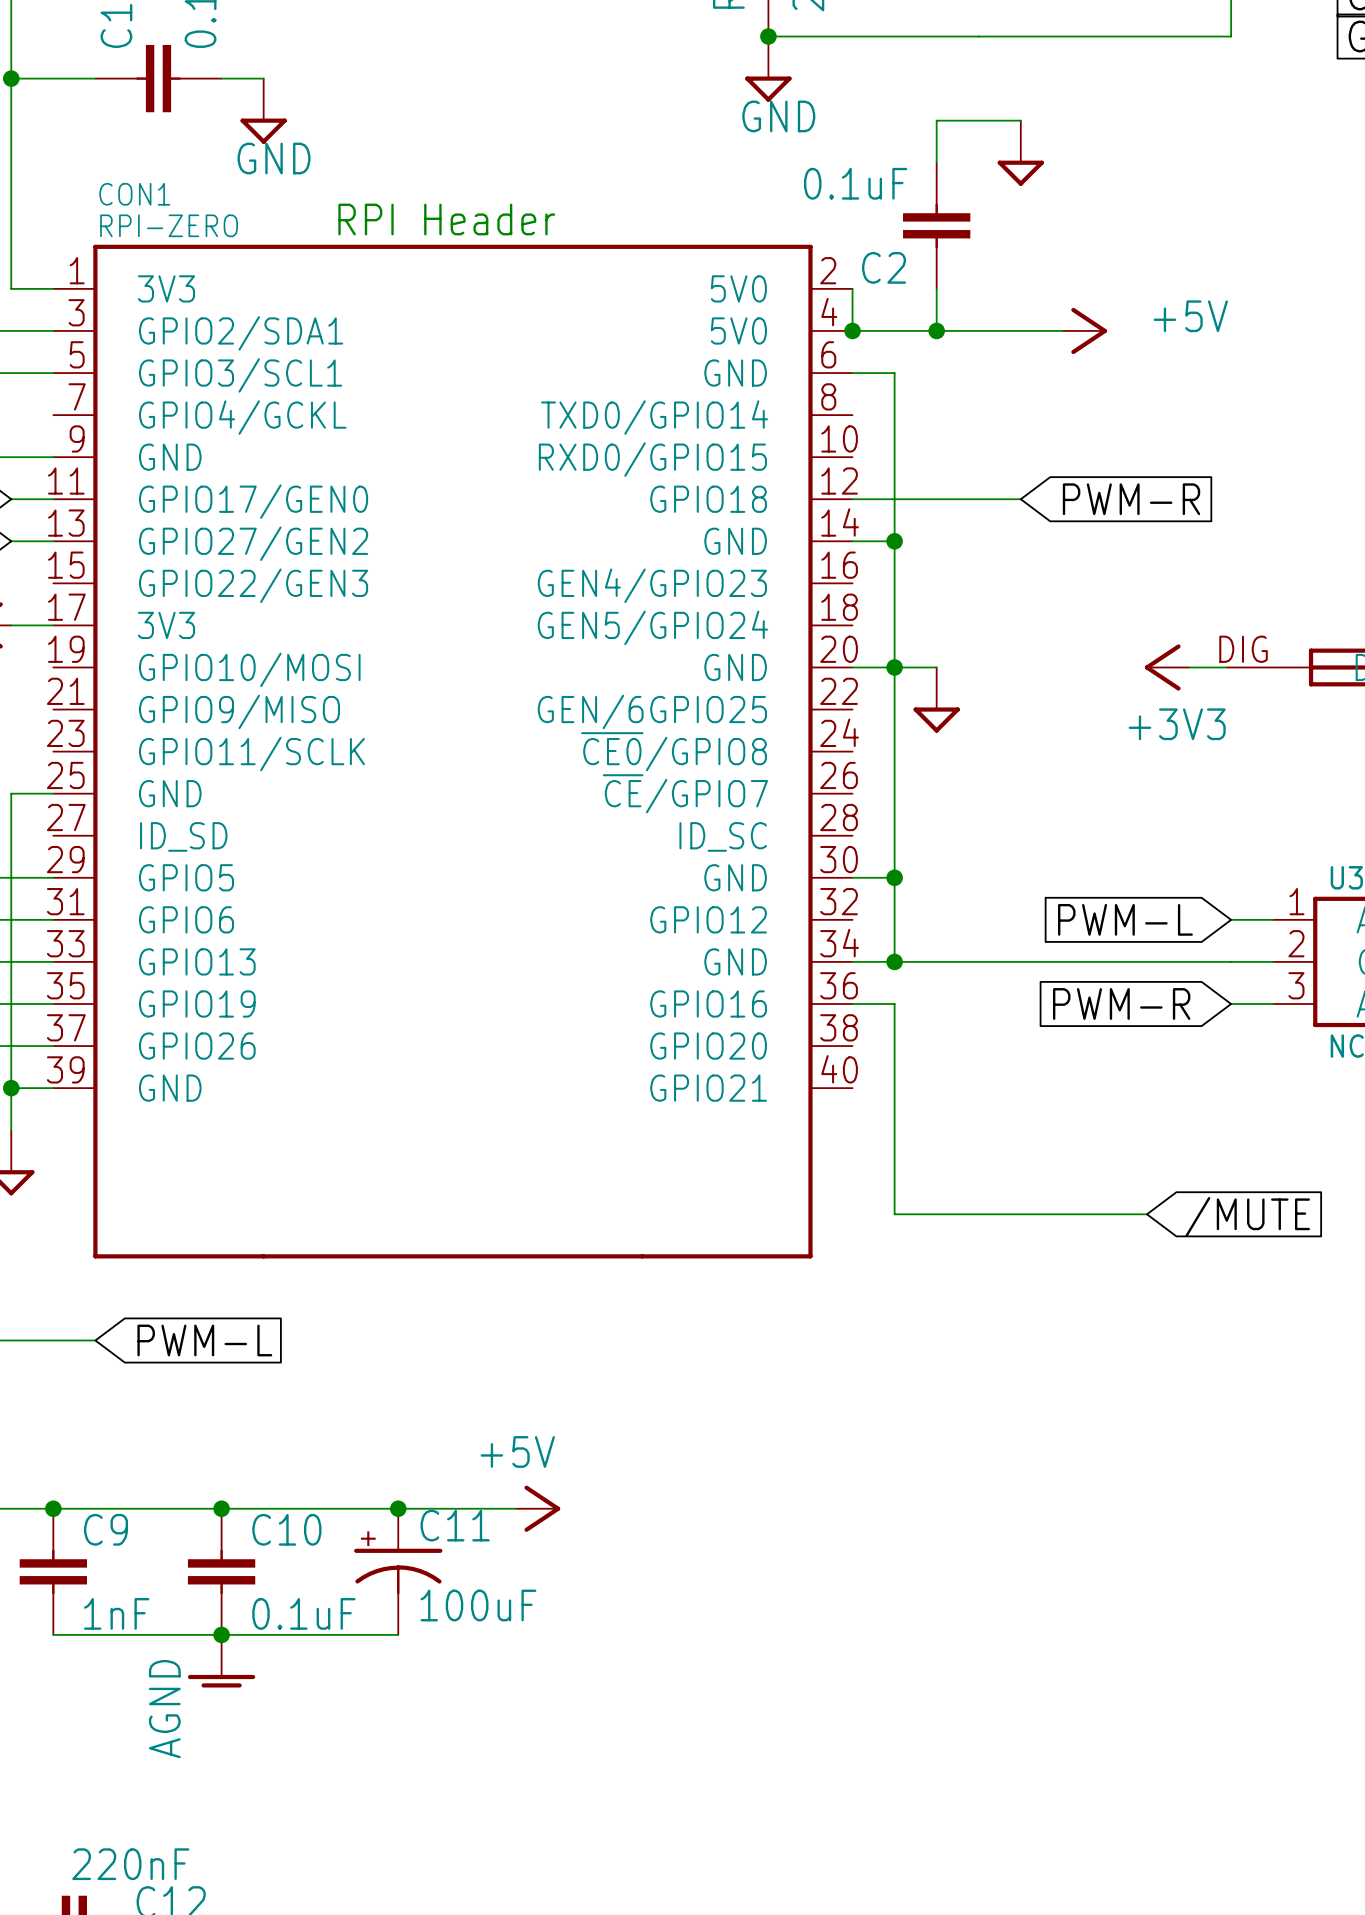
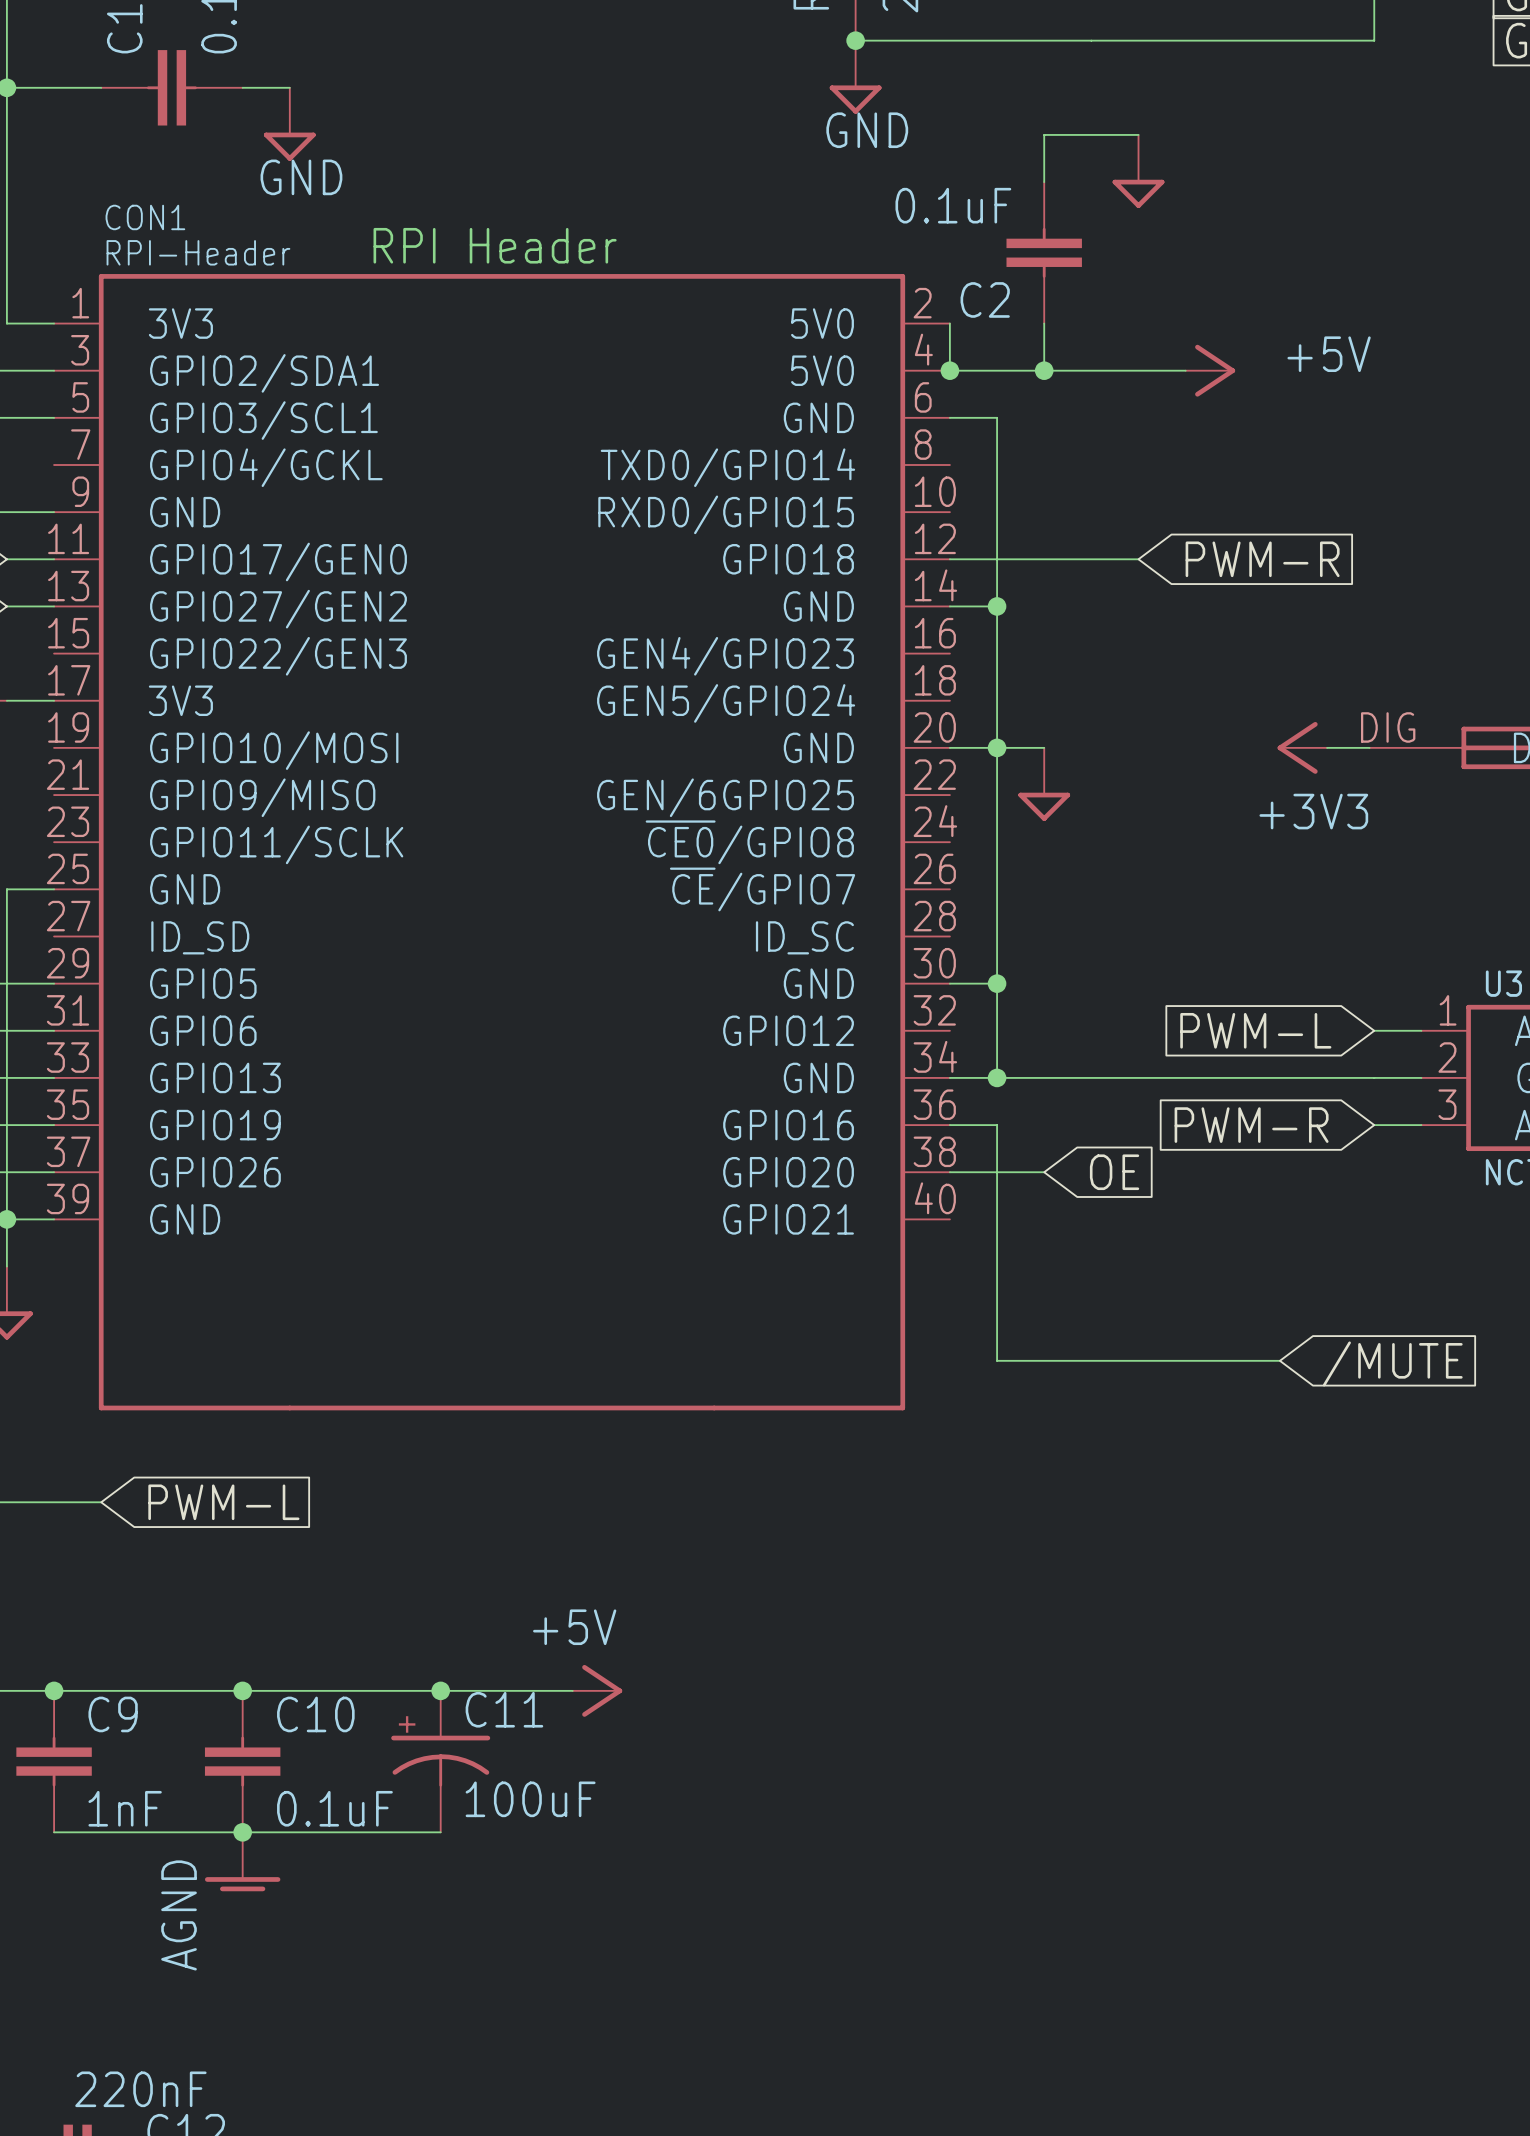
CON1 value: RPI-ZERO (169, 225) -> RPI-Header (198, 252)
wire: none -> (949, 1172) (1044, 1172)
global label: none -> OE (1114, 1172)

